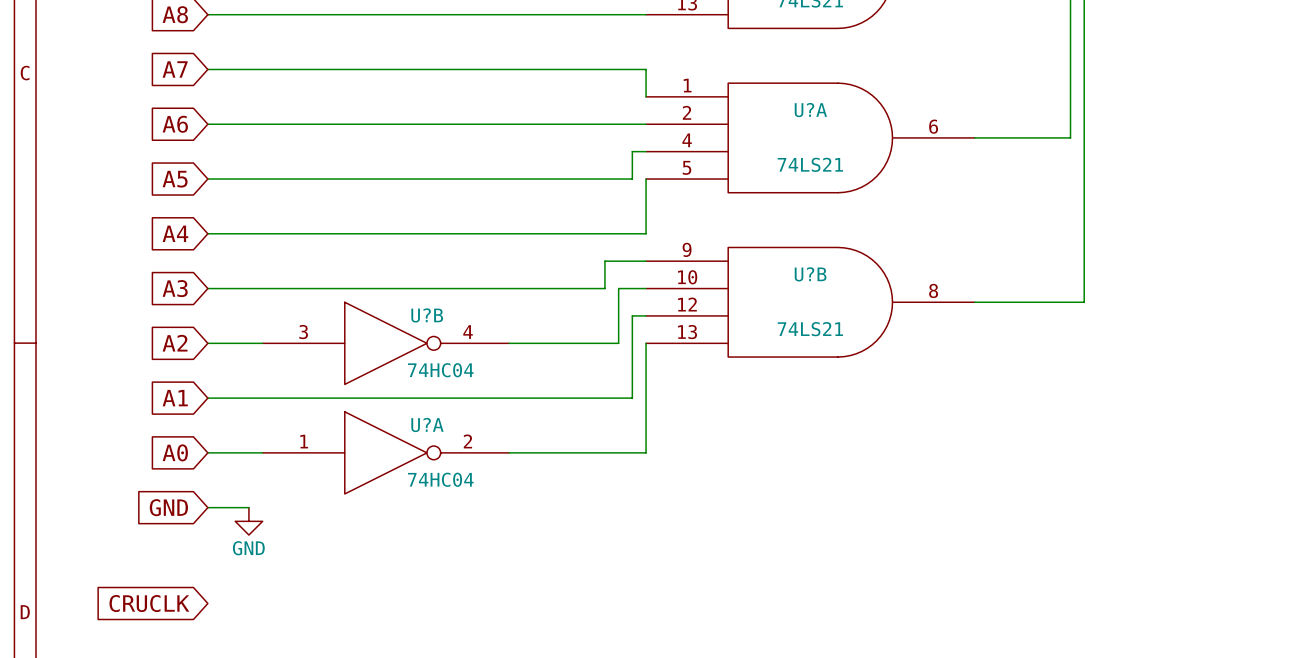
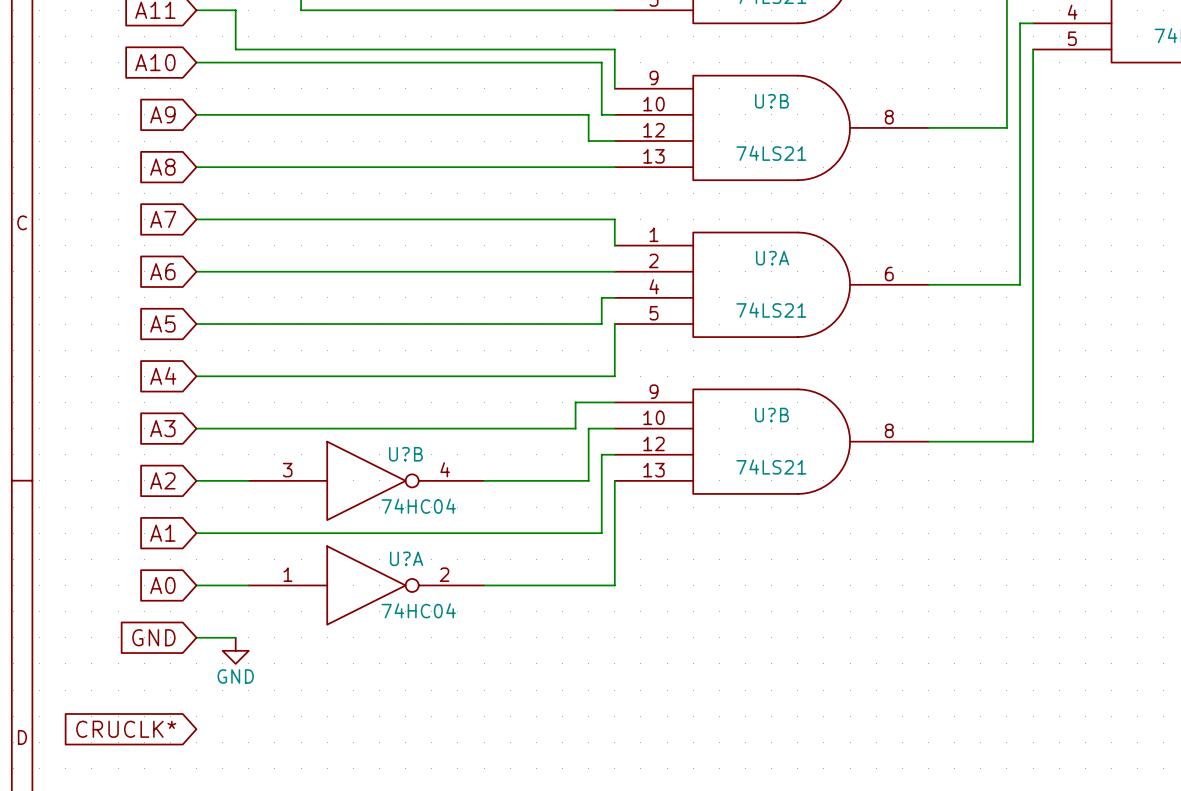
global label: CRUCLK (149, 603) -> CRUCLK* (126, 729)

